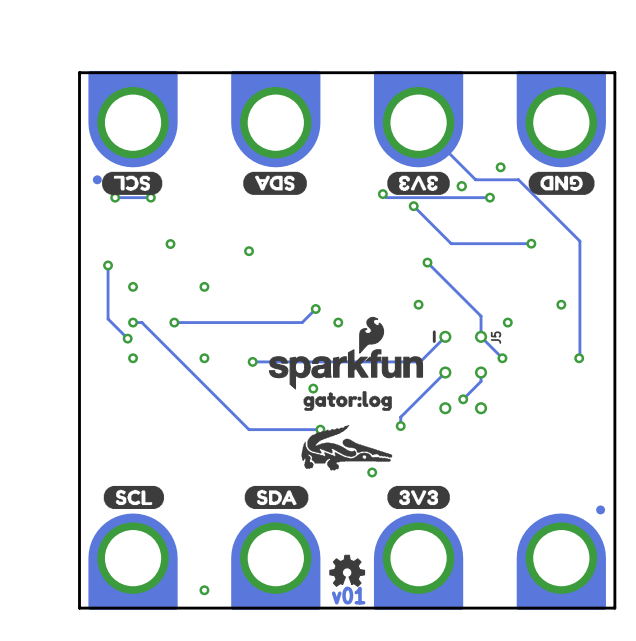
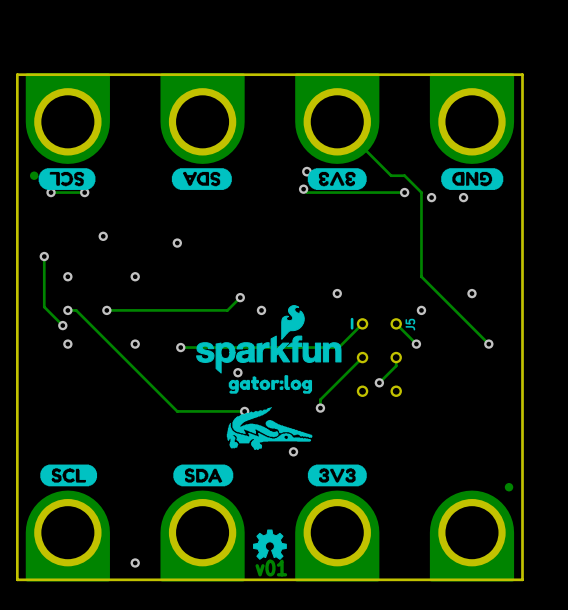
via: (500, 167) -> none
track: (489, 179) (518, 179) (579, 241) (579, 358) -> (404, 175) (421, 192) (421, 276) (488, 344)
via position: (461, 186) -> (306, 171)
via: none -> (431, 197)
via: none -> (463, 197)
track: (413, 206) (451, 243) (531, 243) -> none
via: (413, 206) -> none
via: (531, 243) -> none
track: (427, 262) (481, 316) (481, 336) -> none
via: (427, 262) -> none

